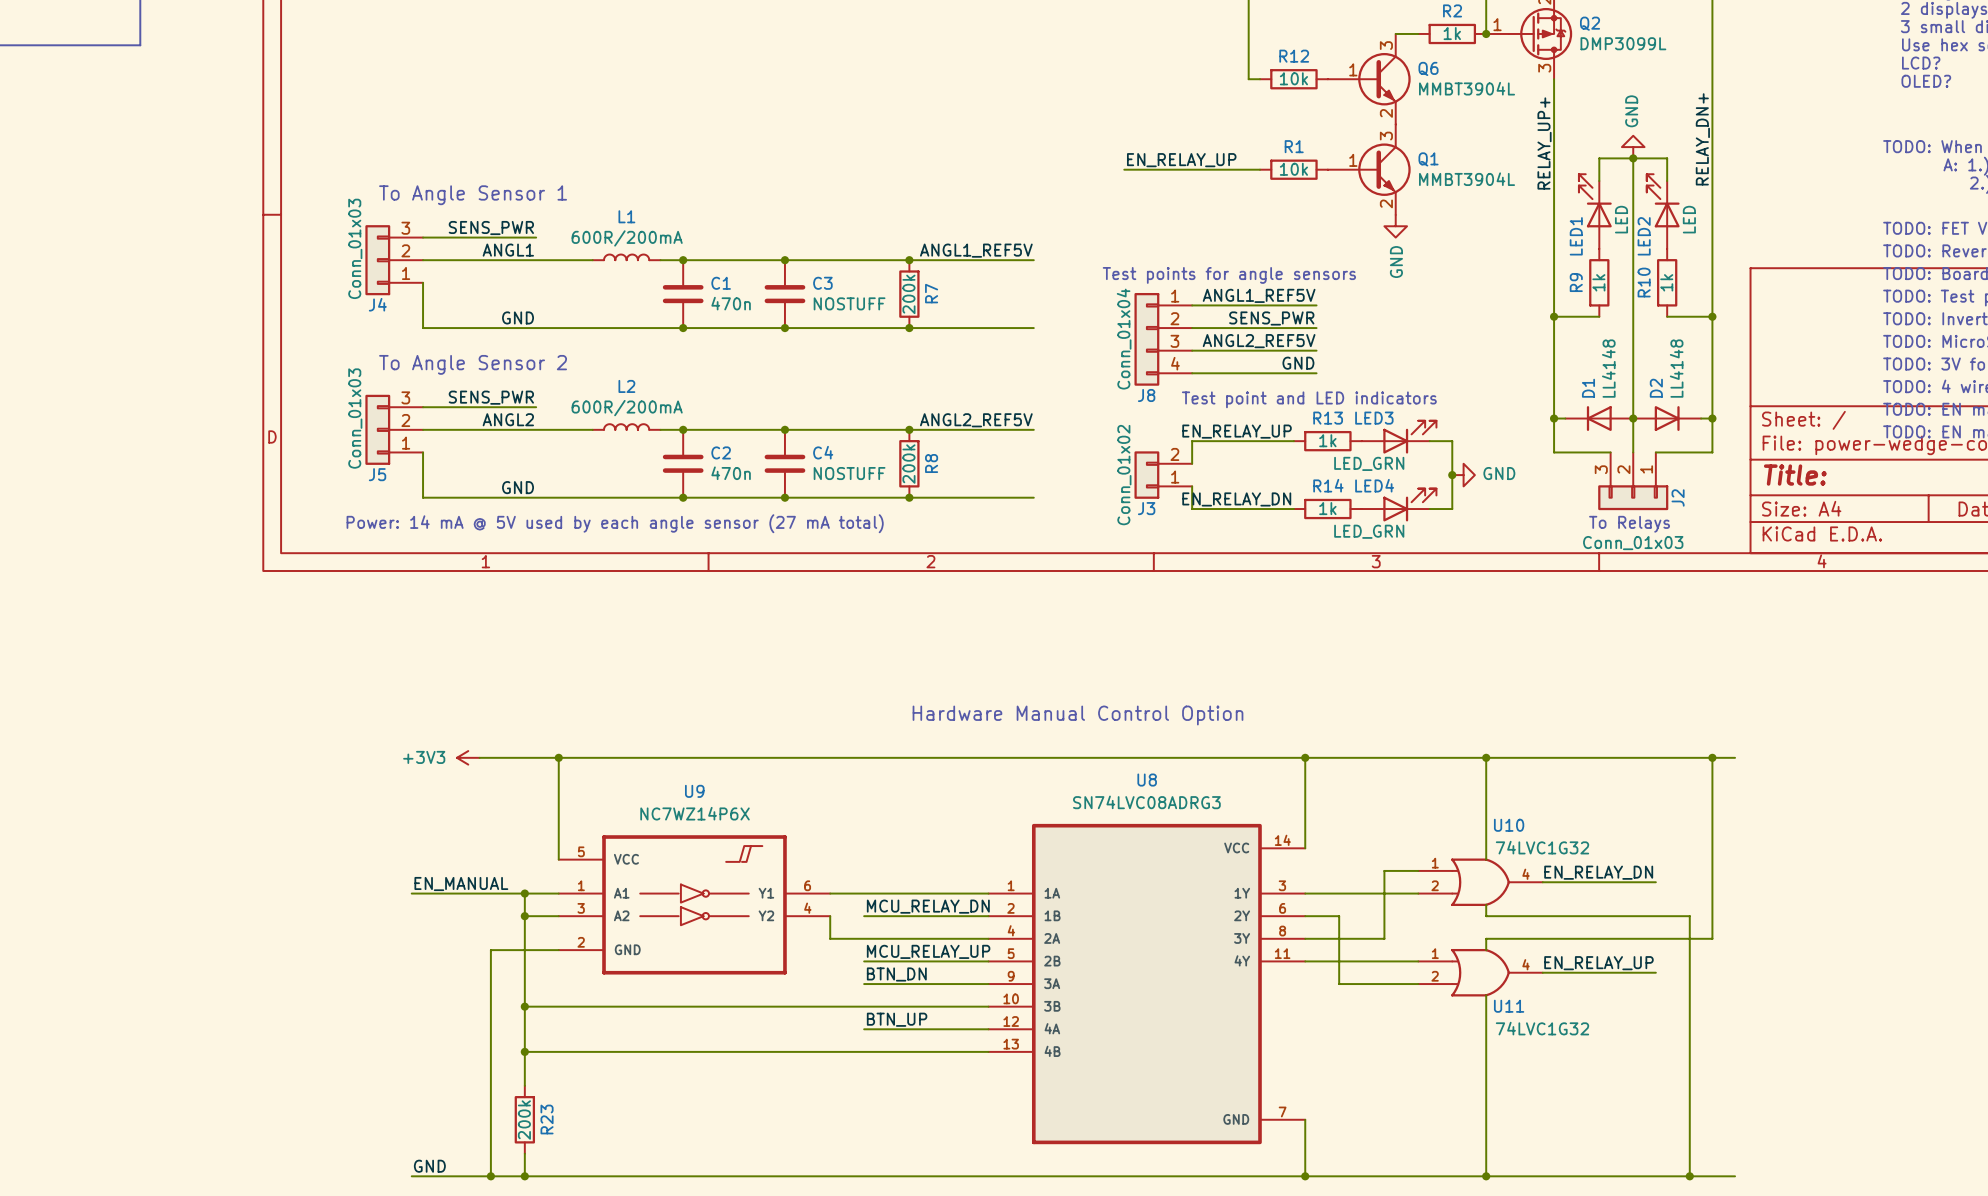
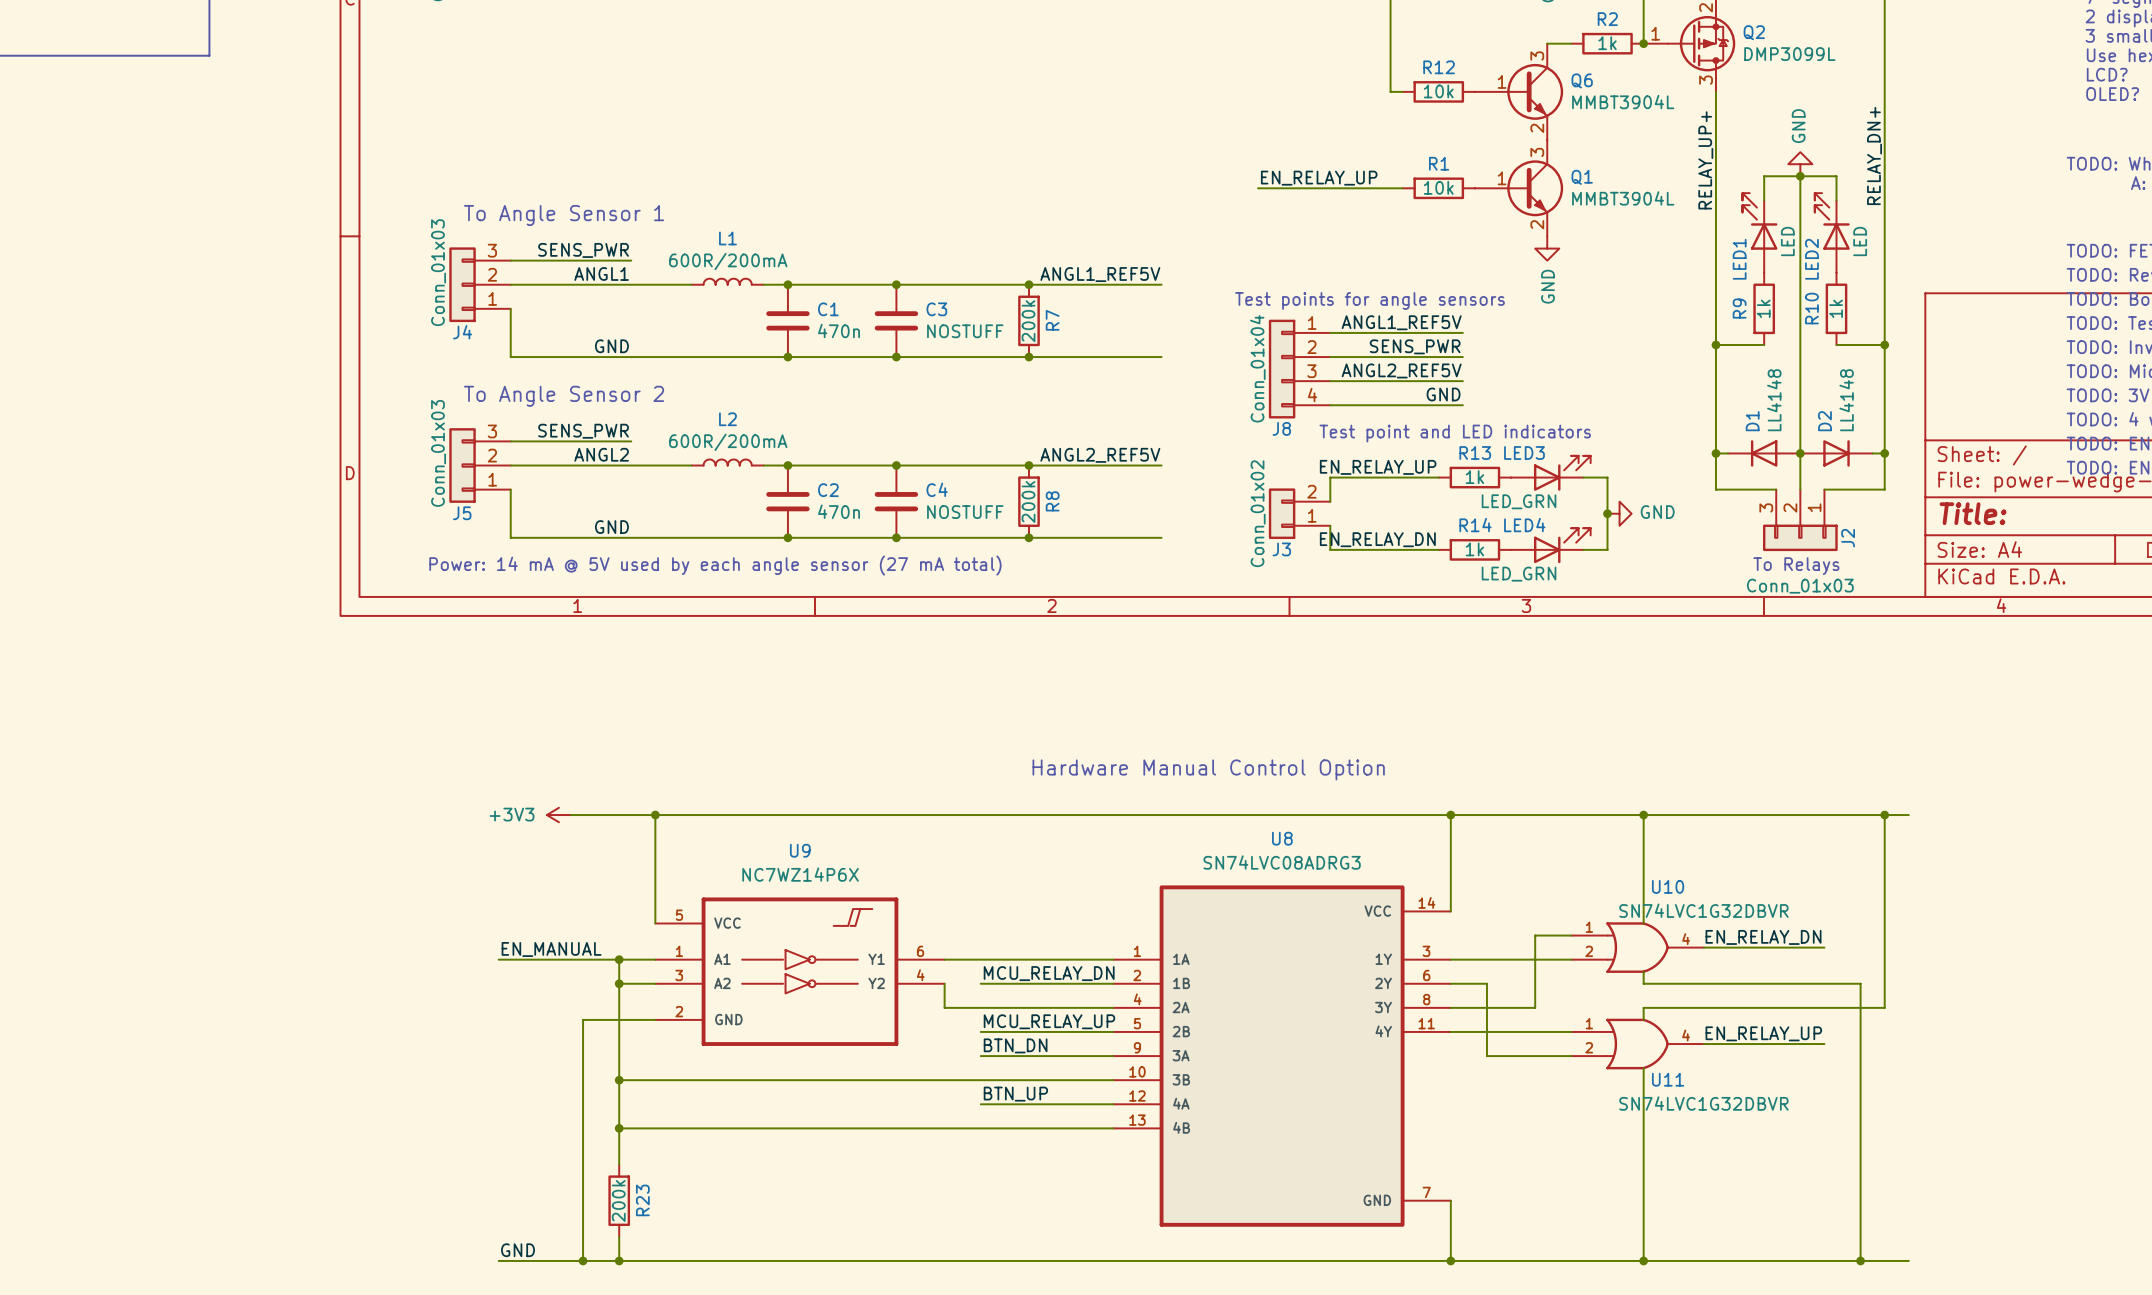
U10 value: 74LVC1G32 (1542, 847) -> SN74LVC1G32DBVR (1703, 910)
U11 value: 74LVC1G32 (1542, 1028) -> SN74LVC1G32DBVR (1703, 1103)

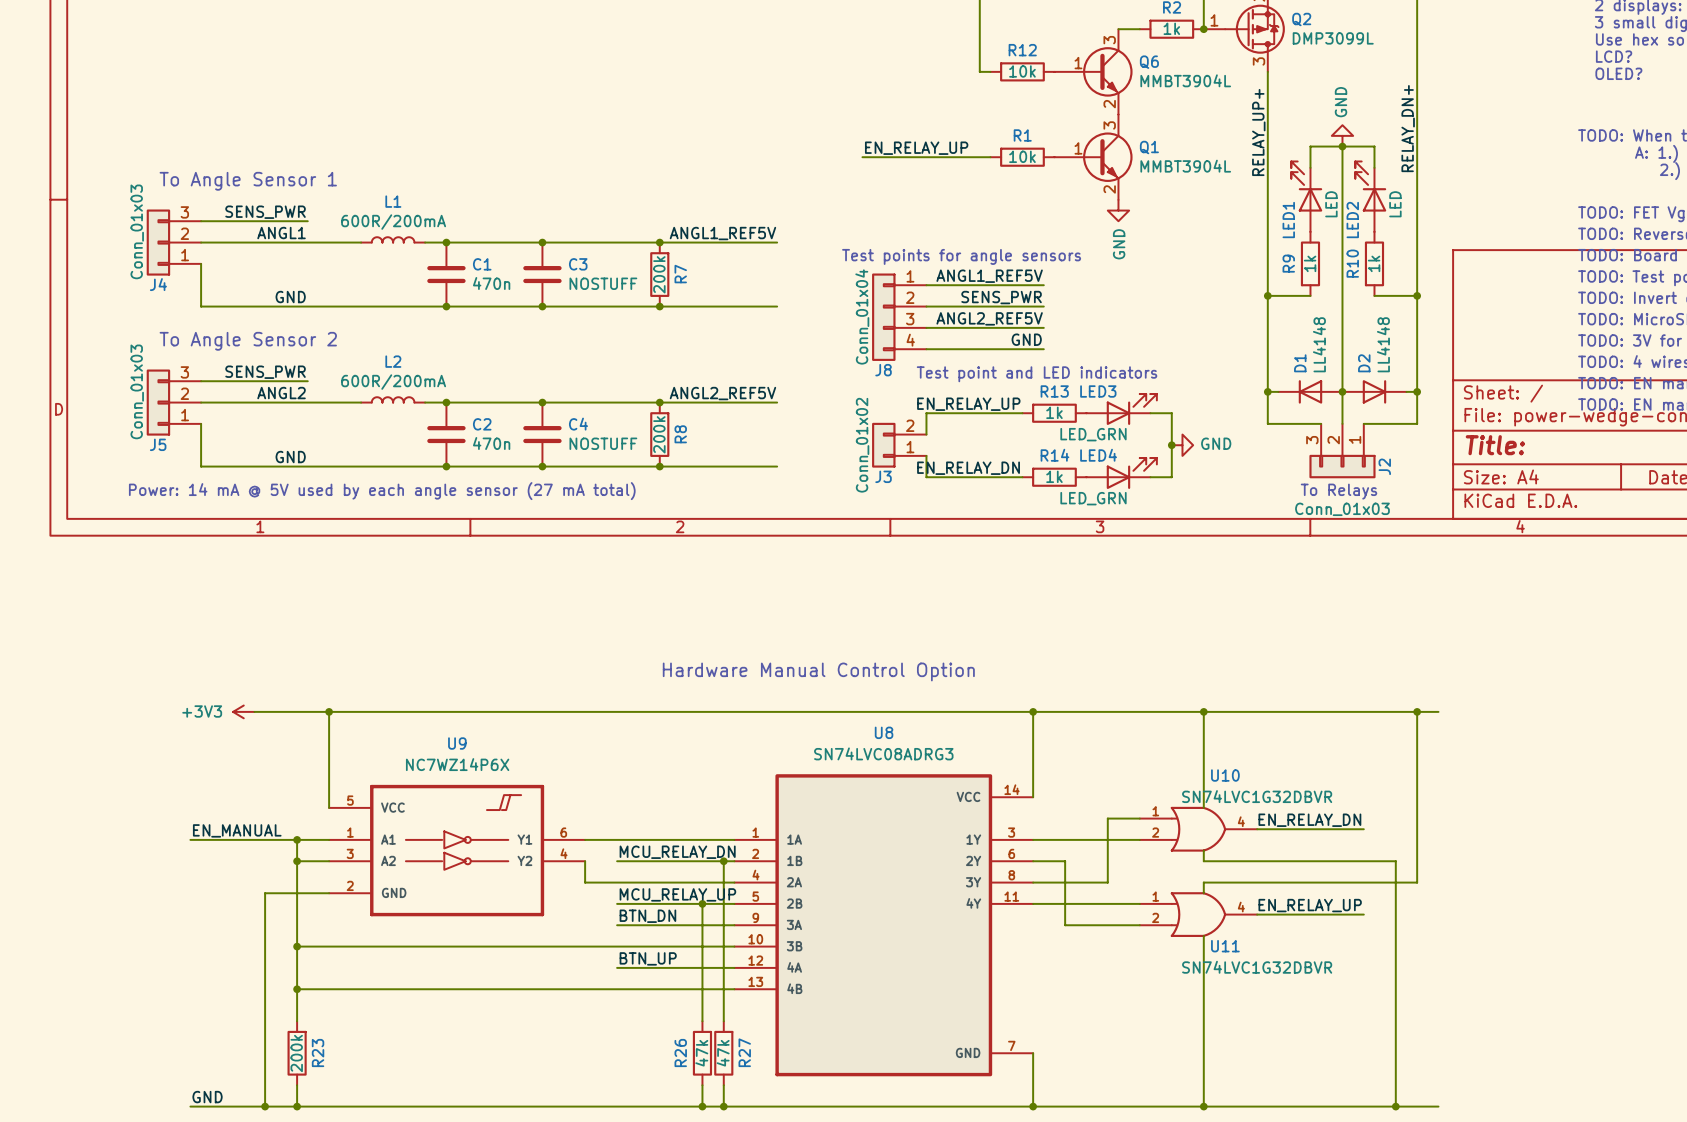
wire: none -> (723, 861) (723, 1021)
junction: none -> (723, 861)
wire: none -> (702, 903) (702, 1021)
junction: none -> (702, 903)
R26: none -> 47k (702, 1053)
R27: none -> 47k (723, 1053)
wire: none -> (702, 1085) (702, 1106)
wire: none -> (723, 1085) (723, 1106)
junction: none -> (702, 1106)
junction: none -> (723, 1106)

